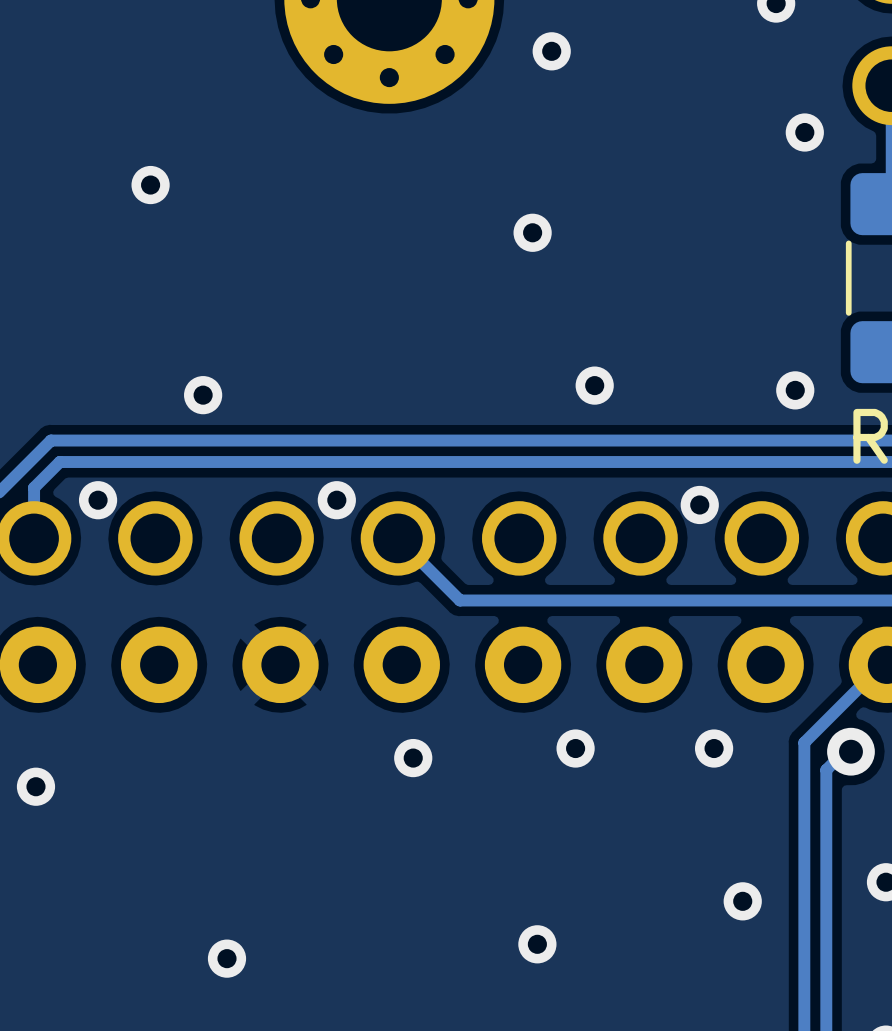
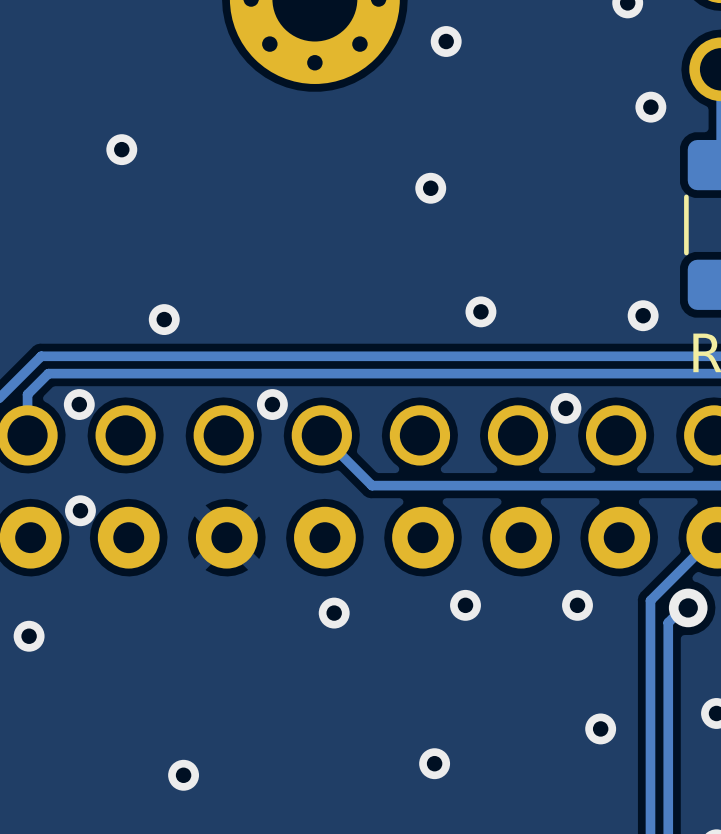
via: none -> (80, 510)

